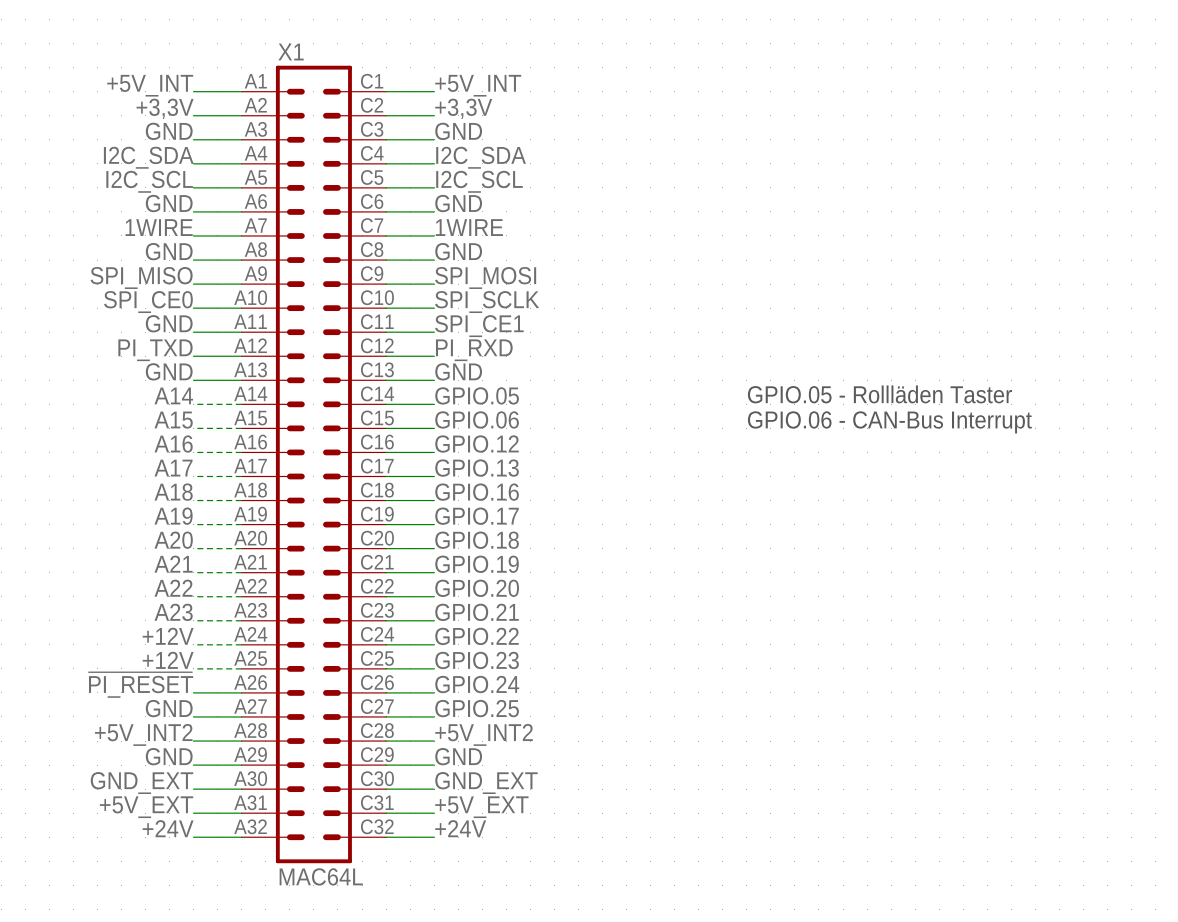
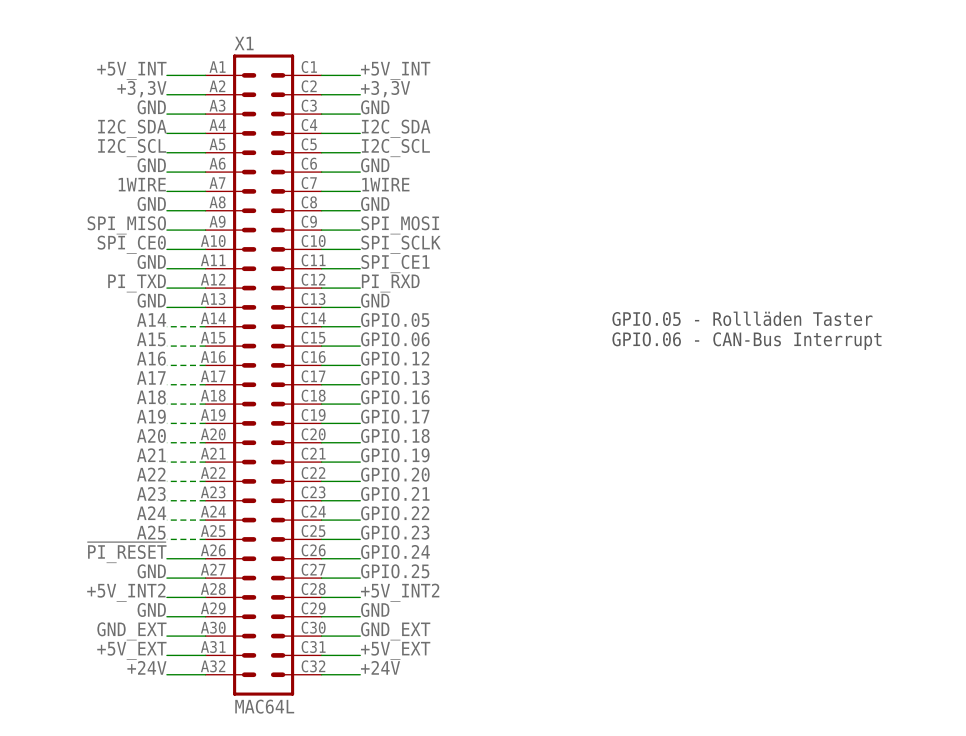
label: +12V (168, 636) -> A24 (151, 513)
label: +12V (168, 660) -> A25 (151, 532)

